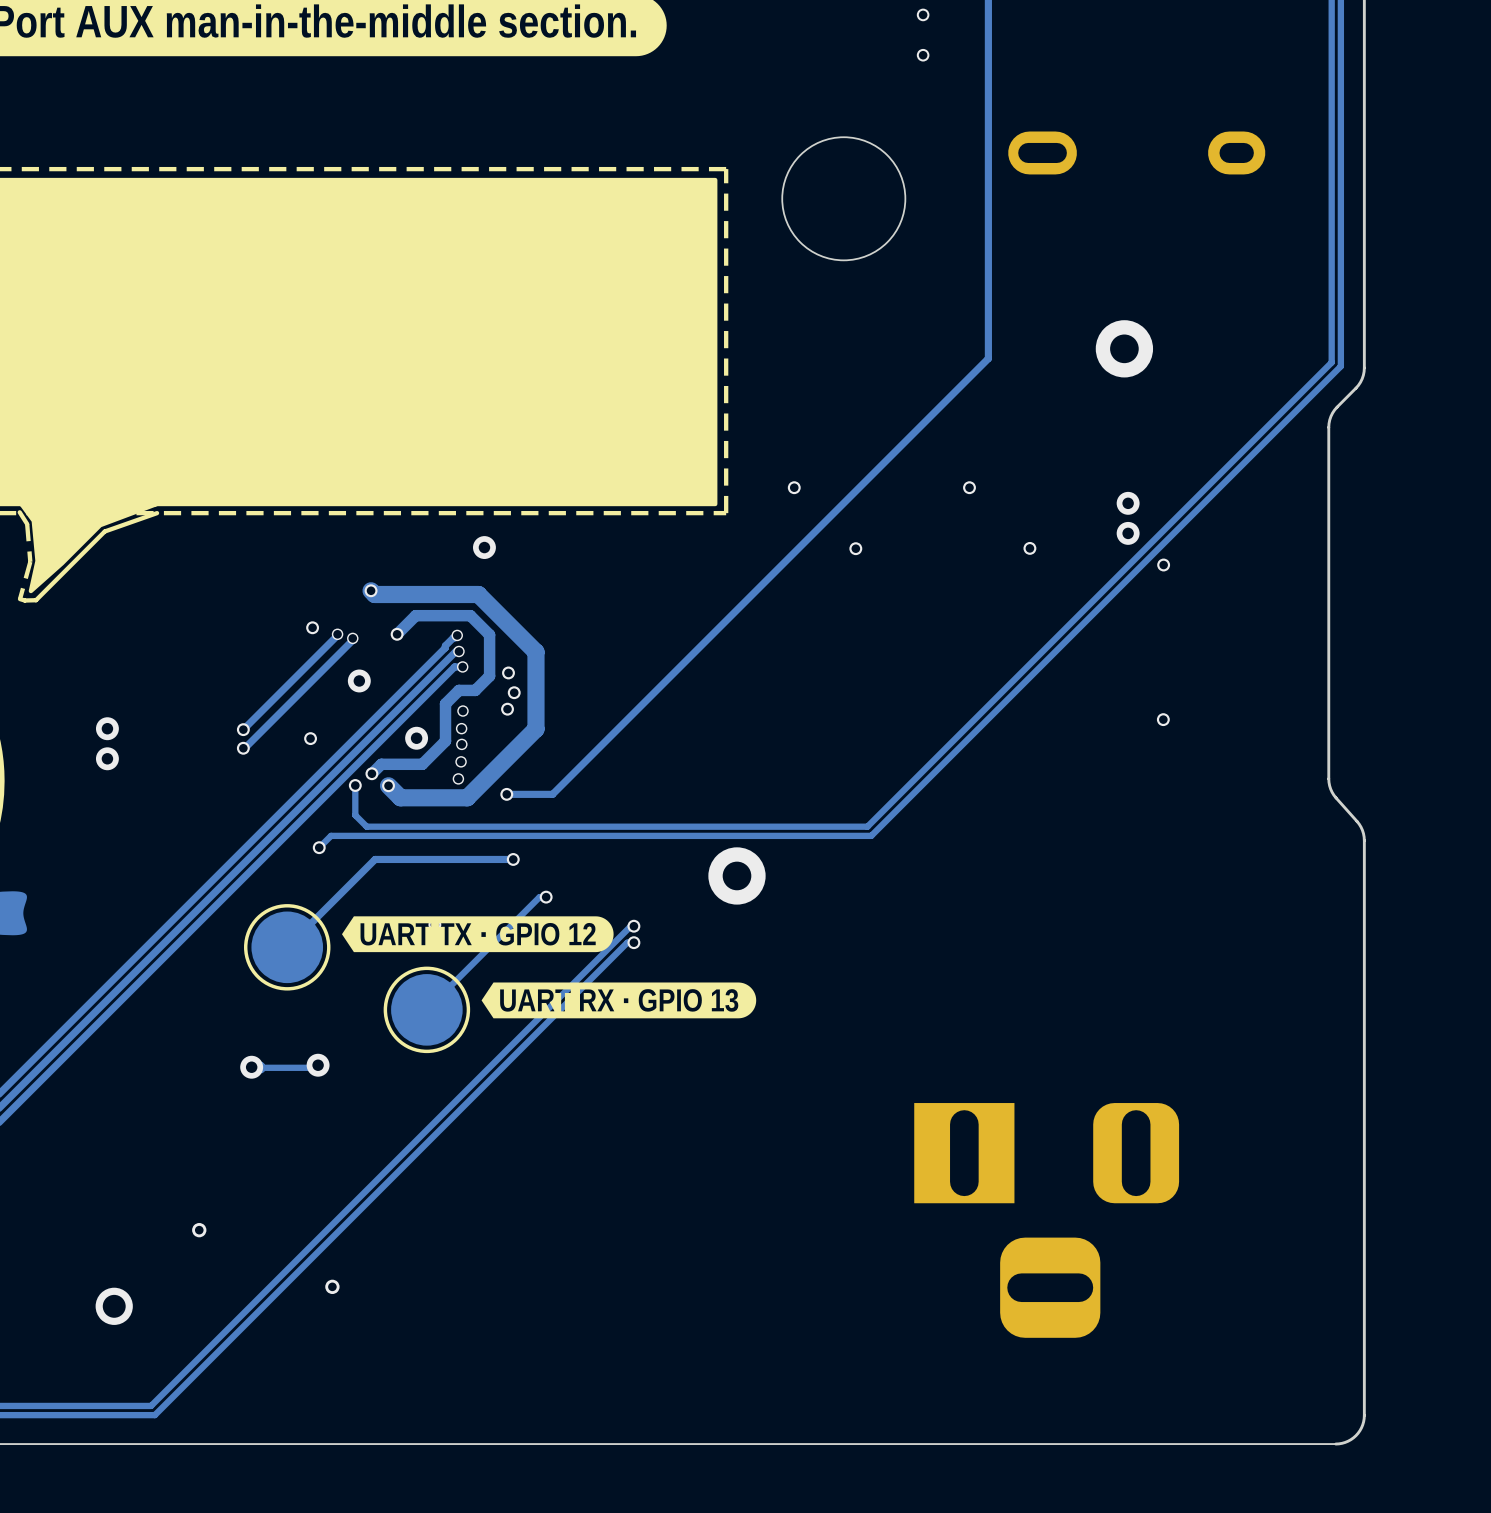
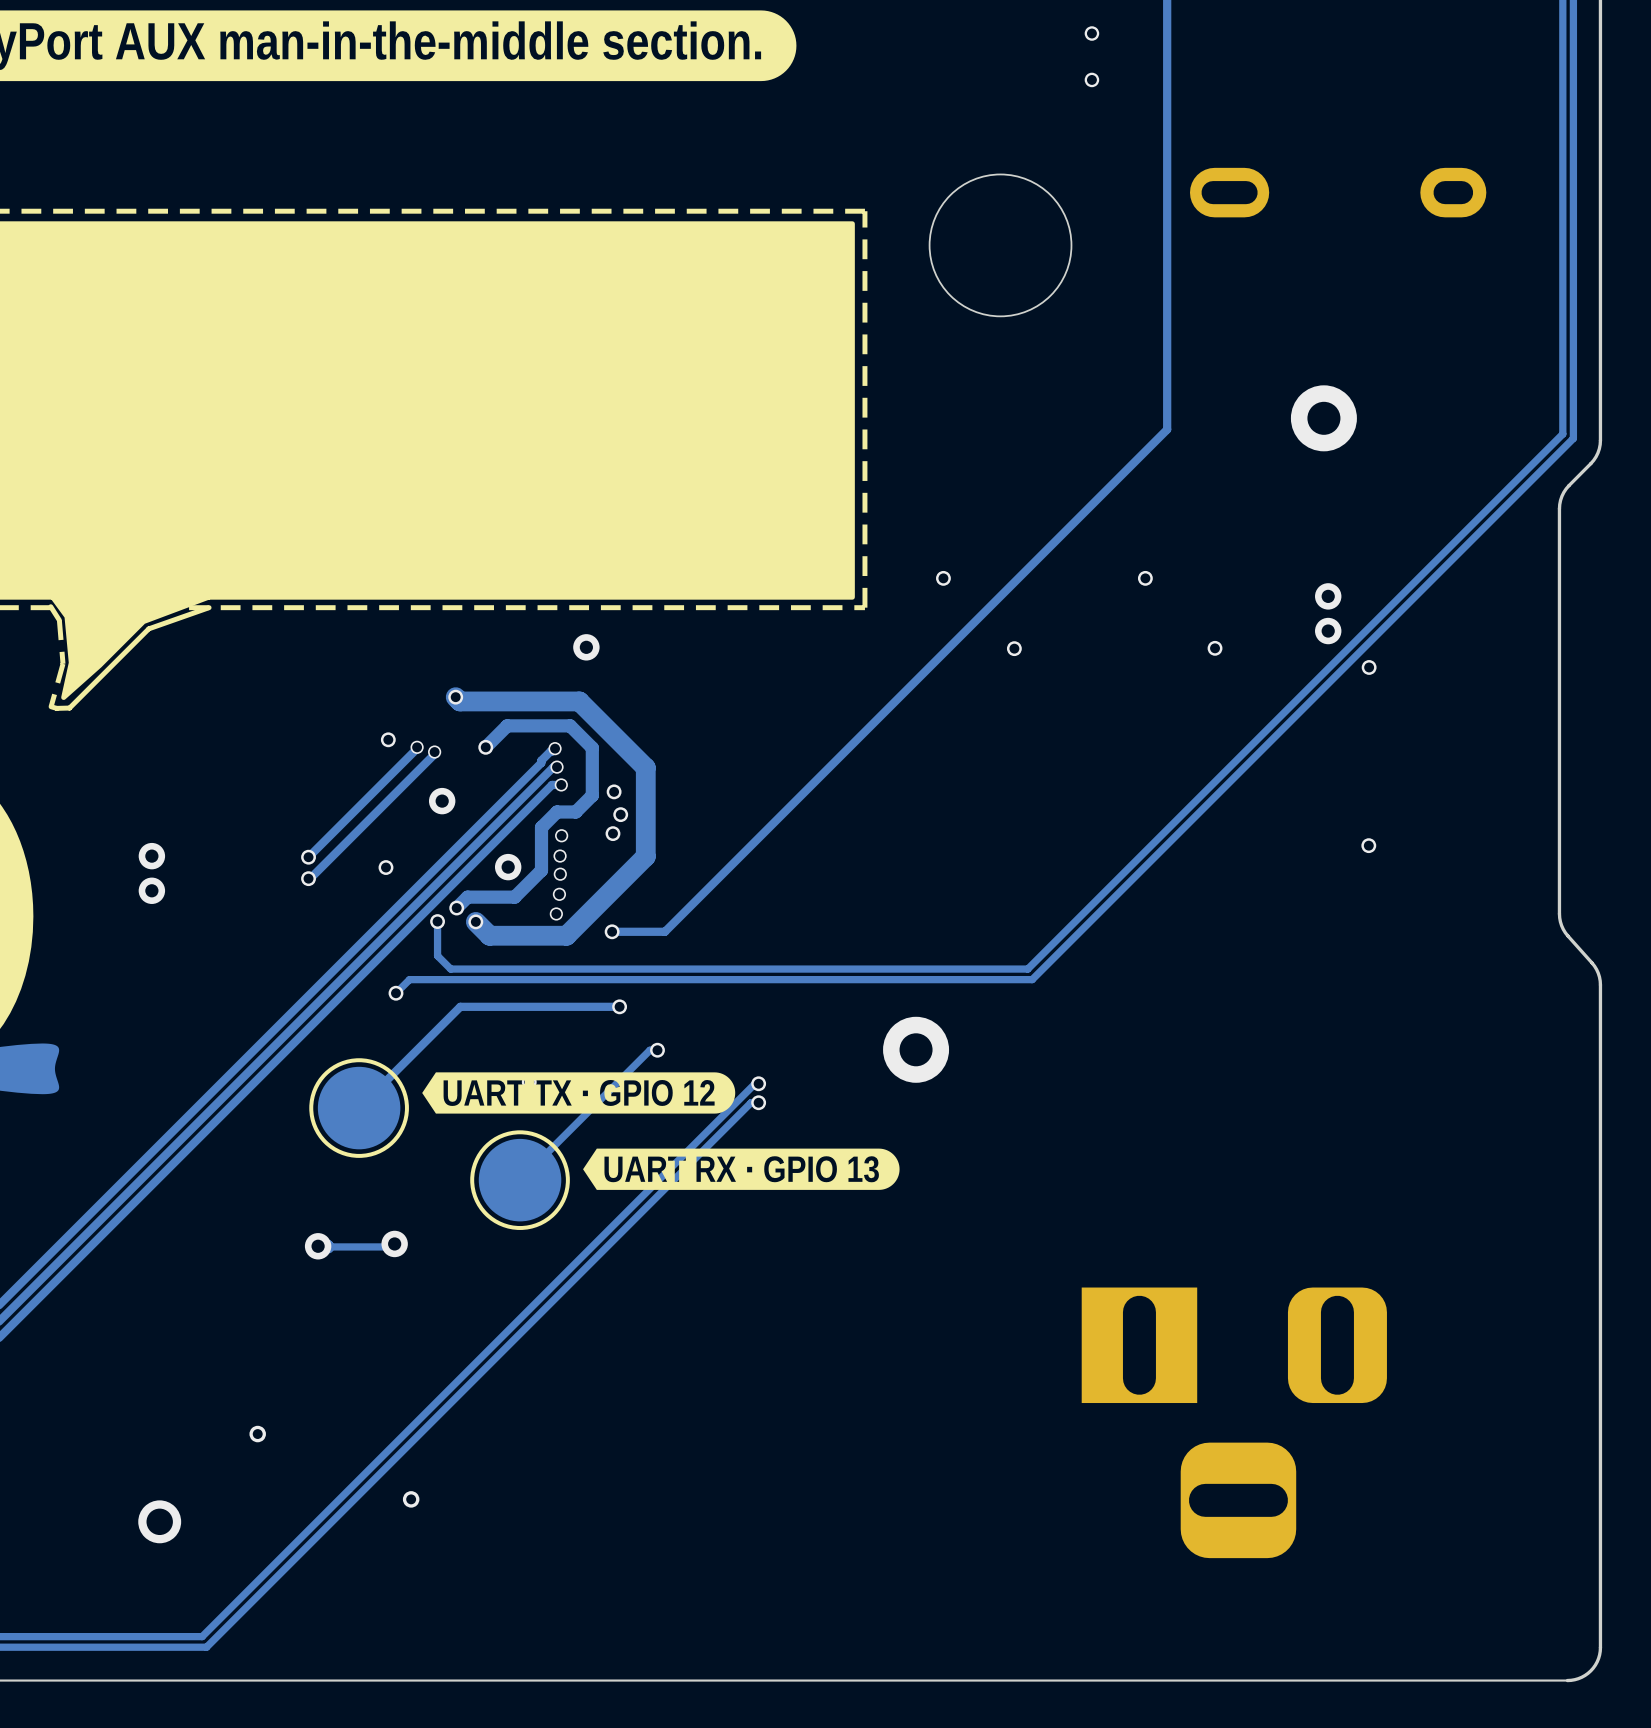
via position: (736, 875) -> (916, 1049)

